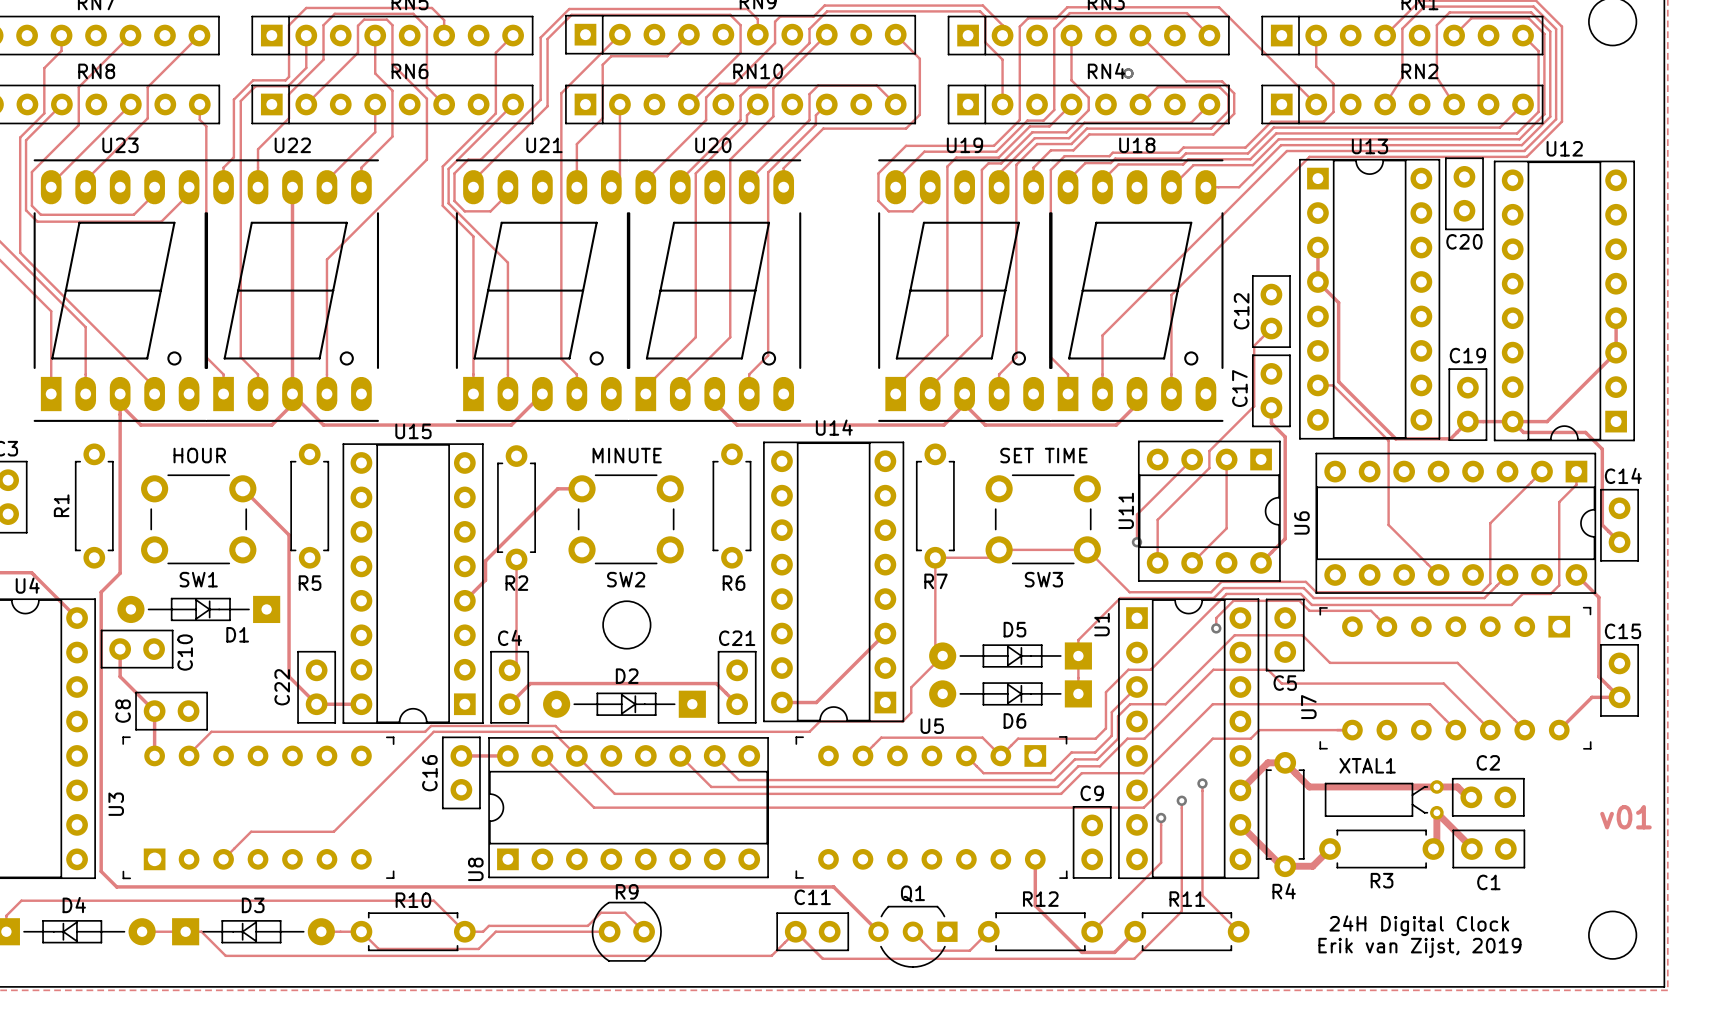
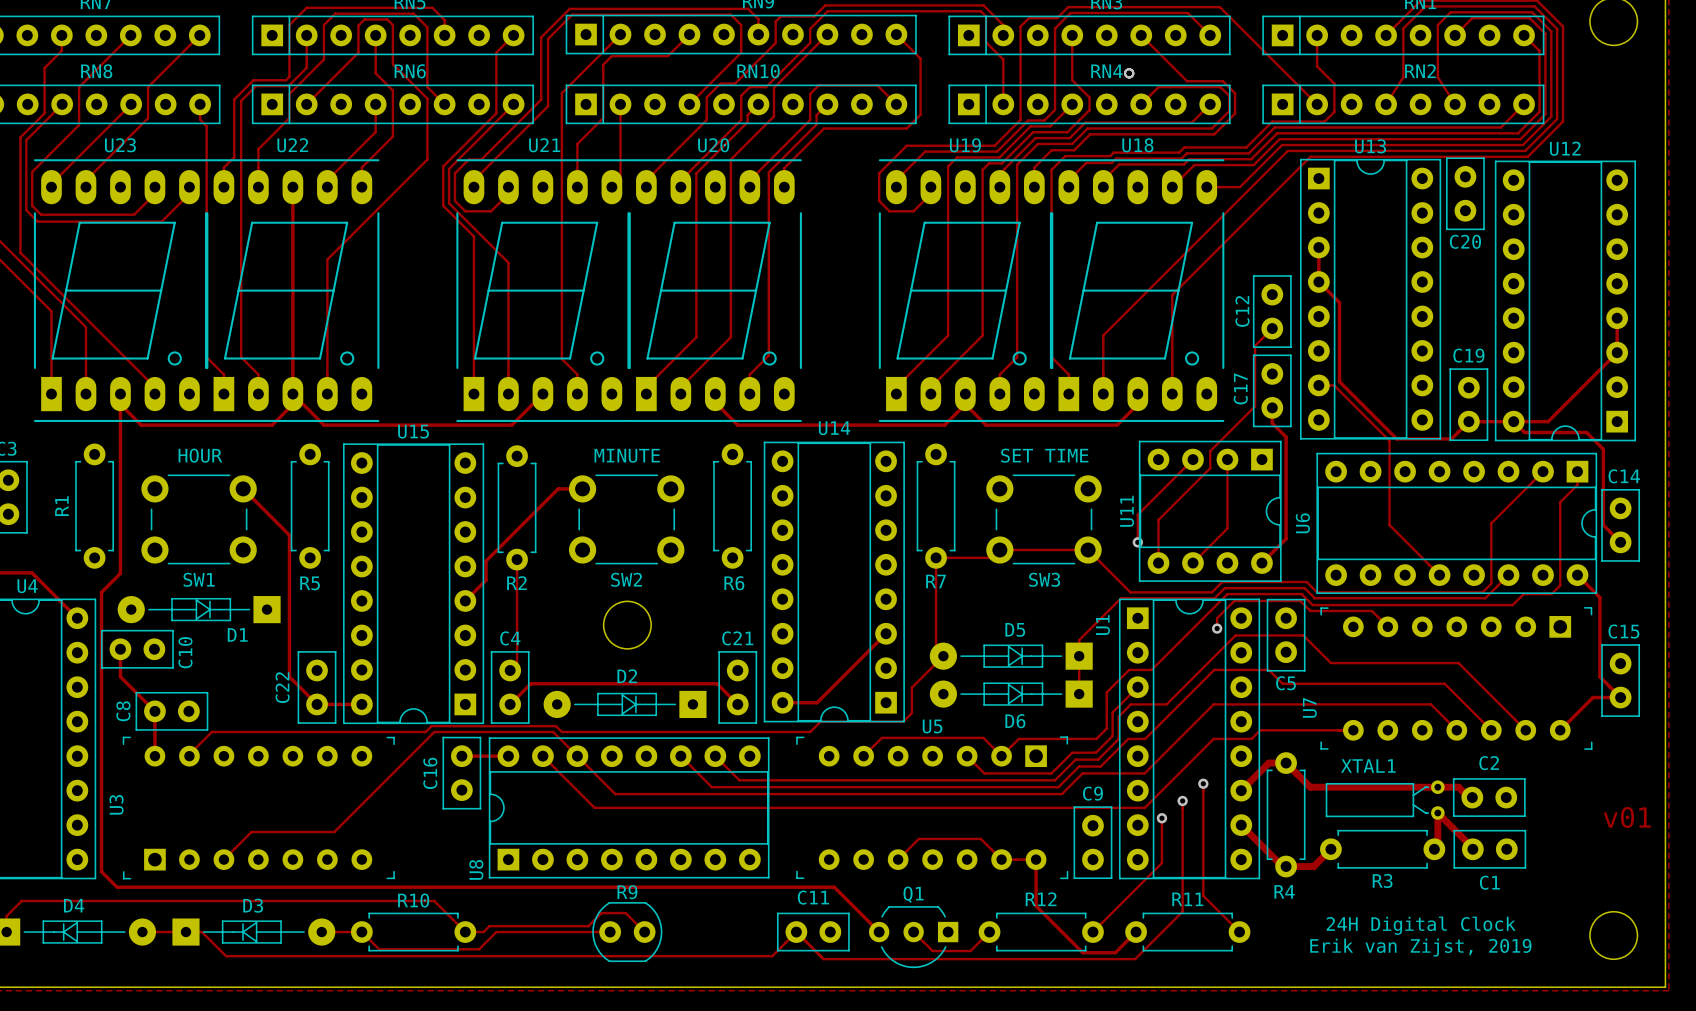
track: none -> (898, 859) (918, 838) (980, 838) (1001, 859) (1036, 859)

